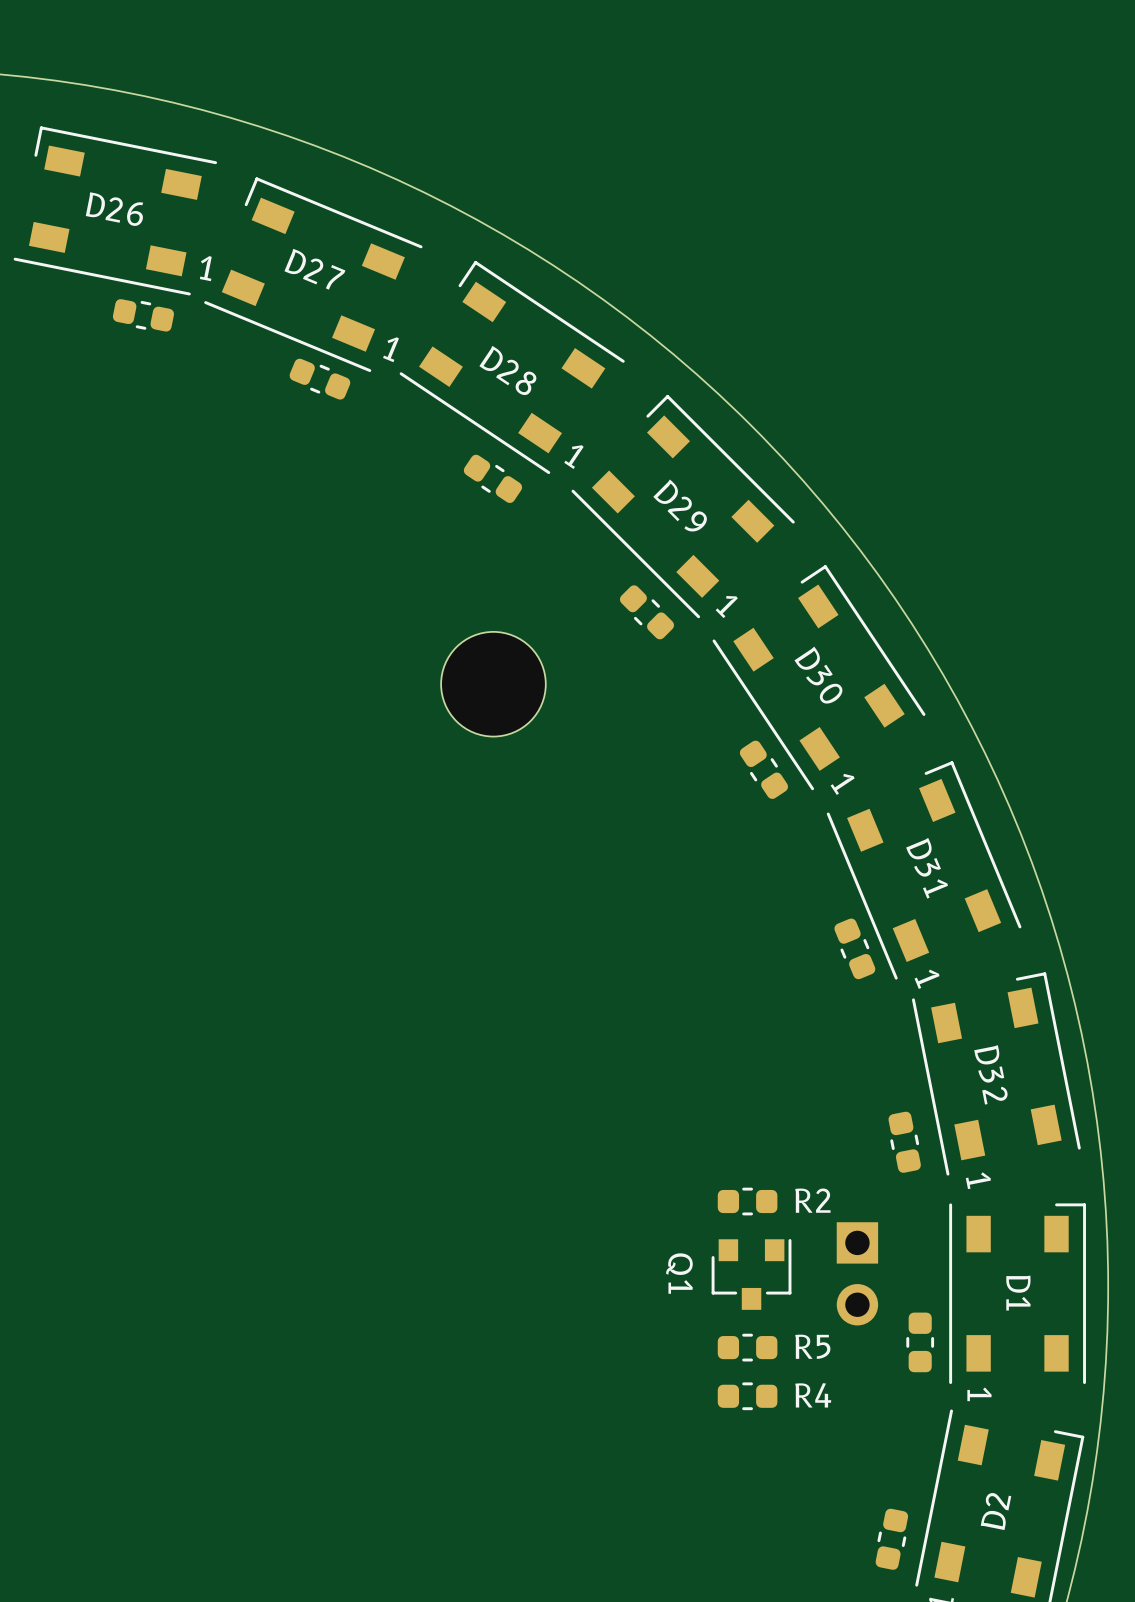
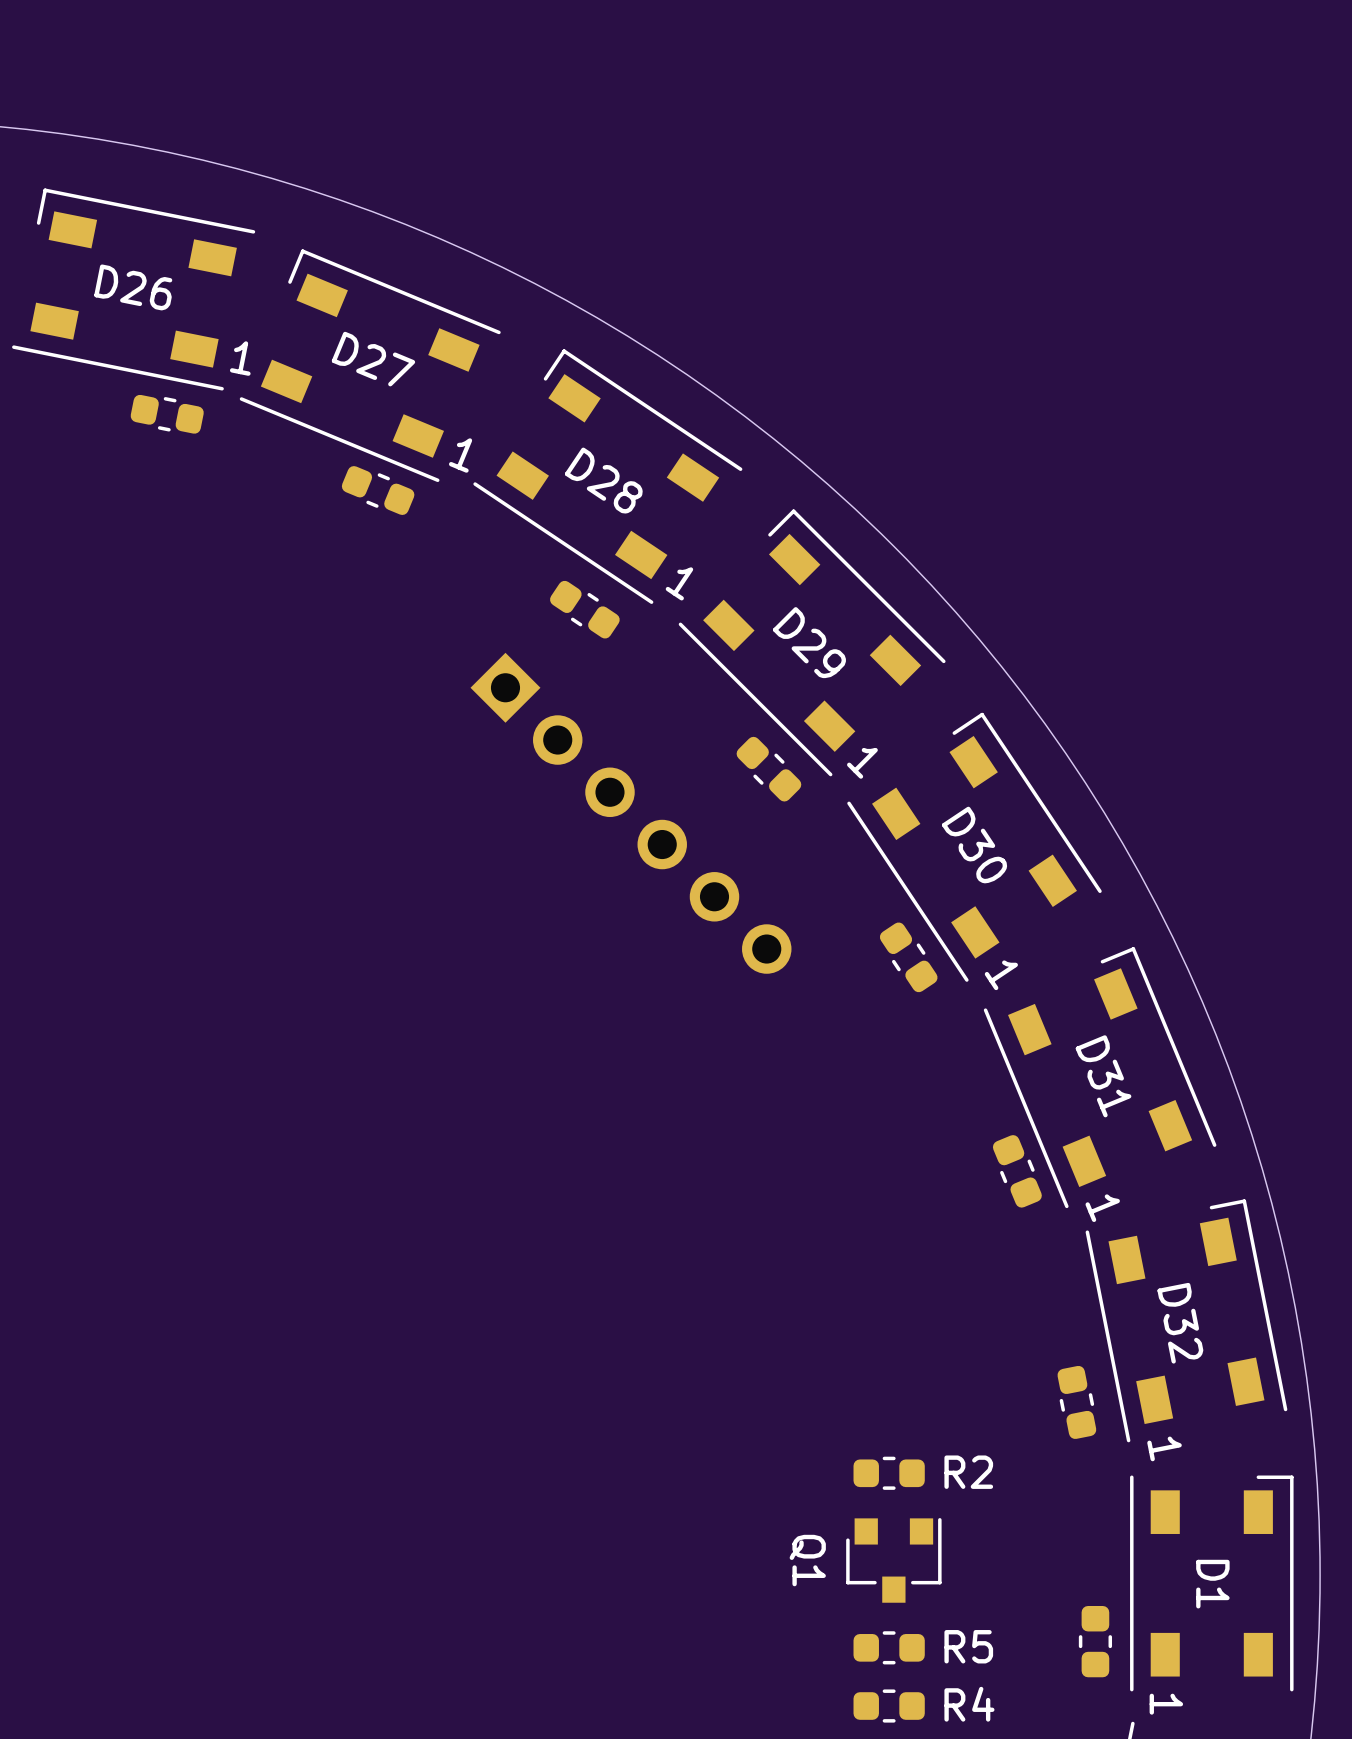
part: none -> (630, 813)
part: (493, 684) -> none
part: (857, 1273) -> none

